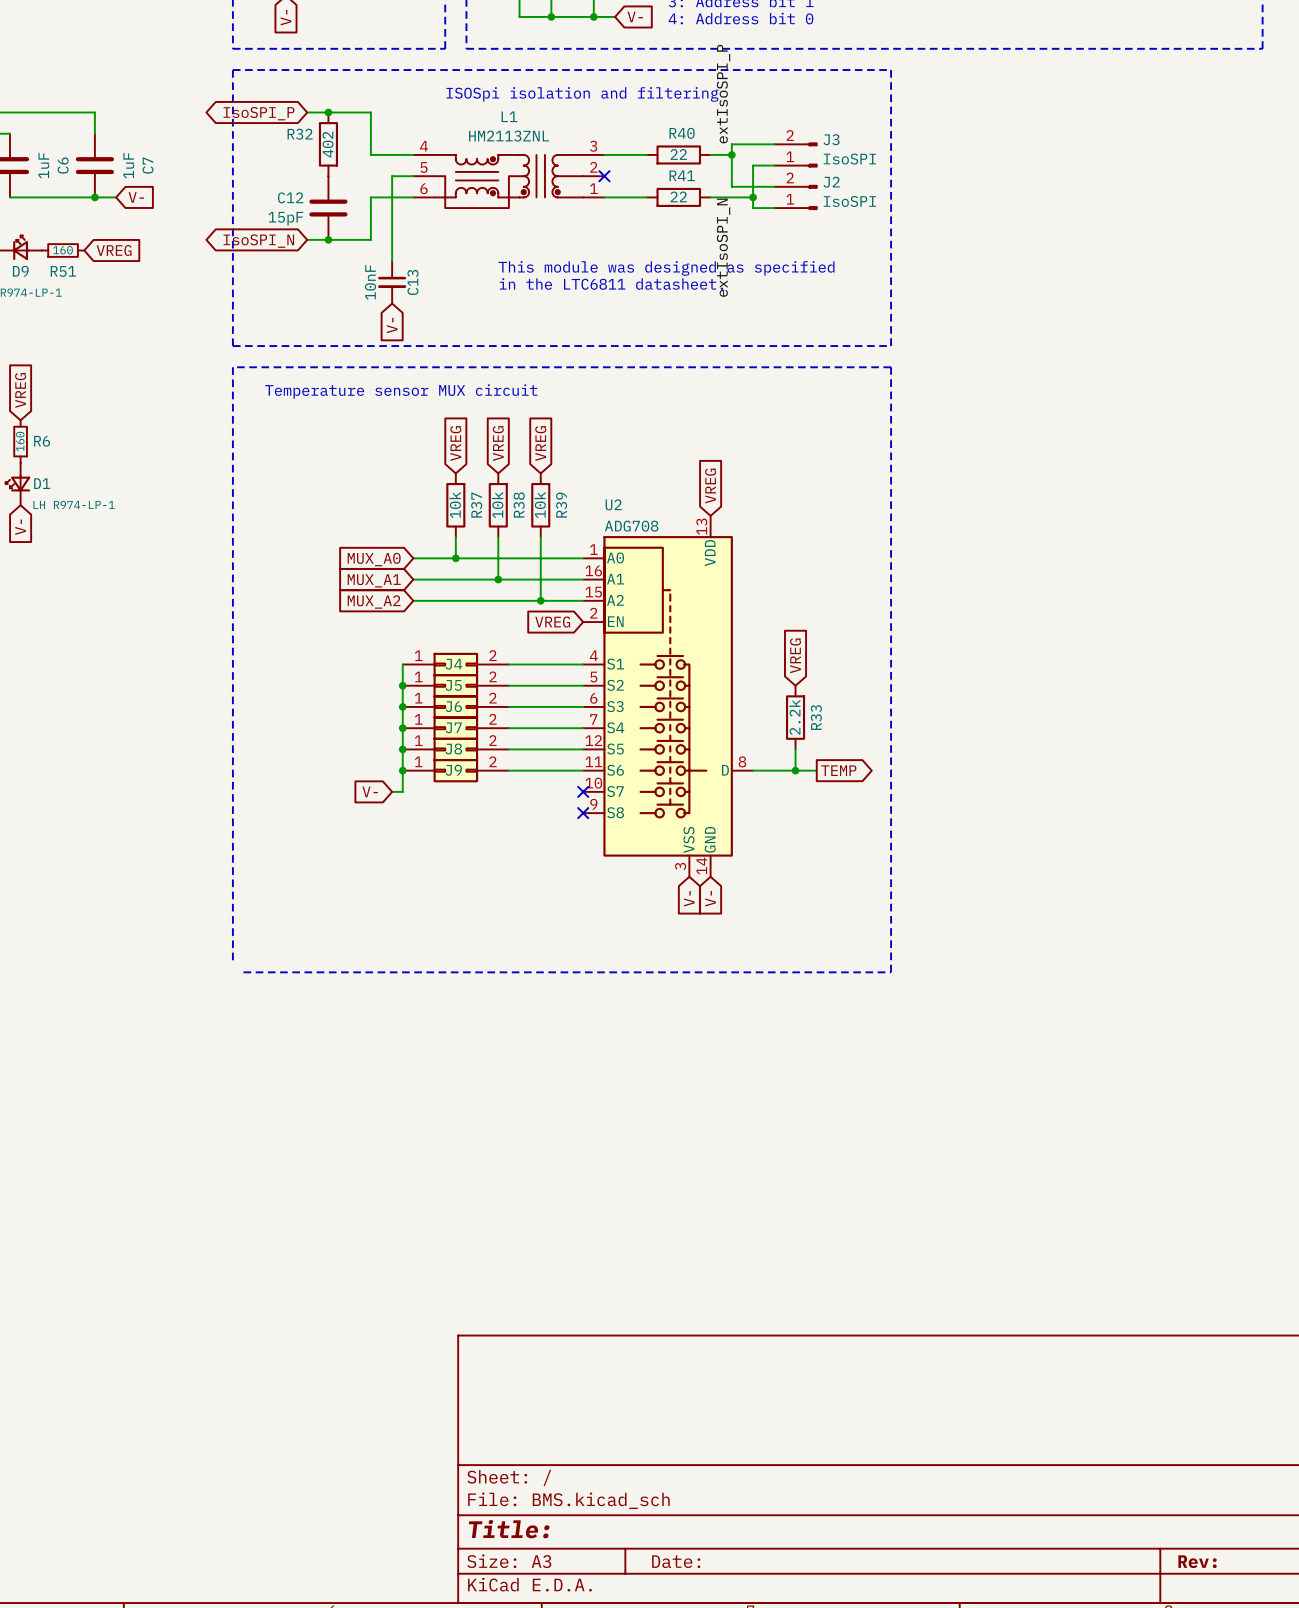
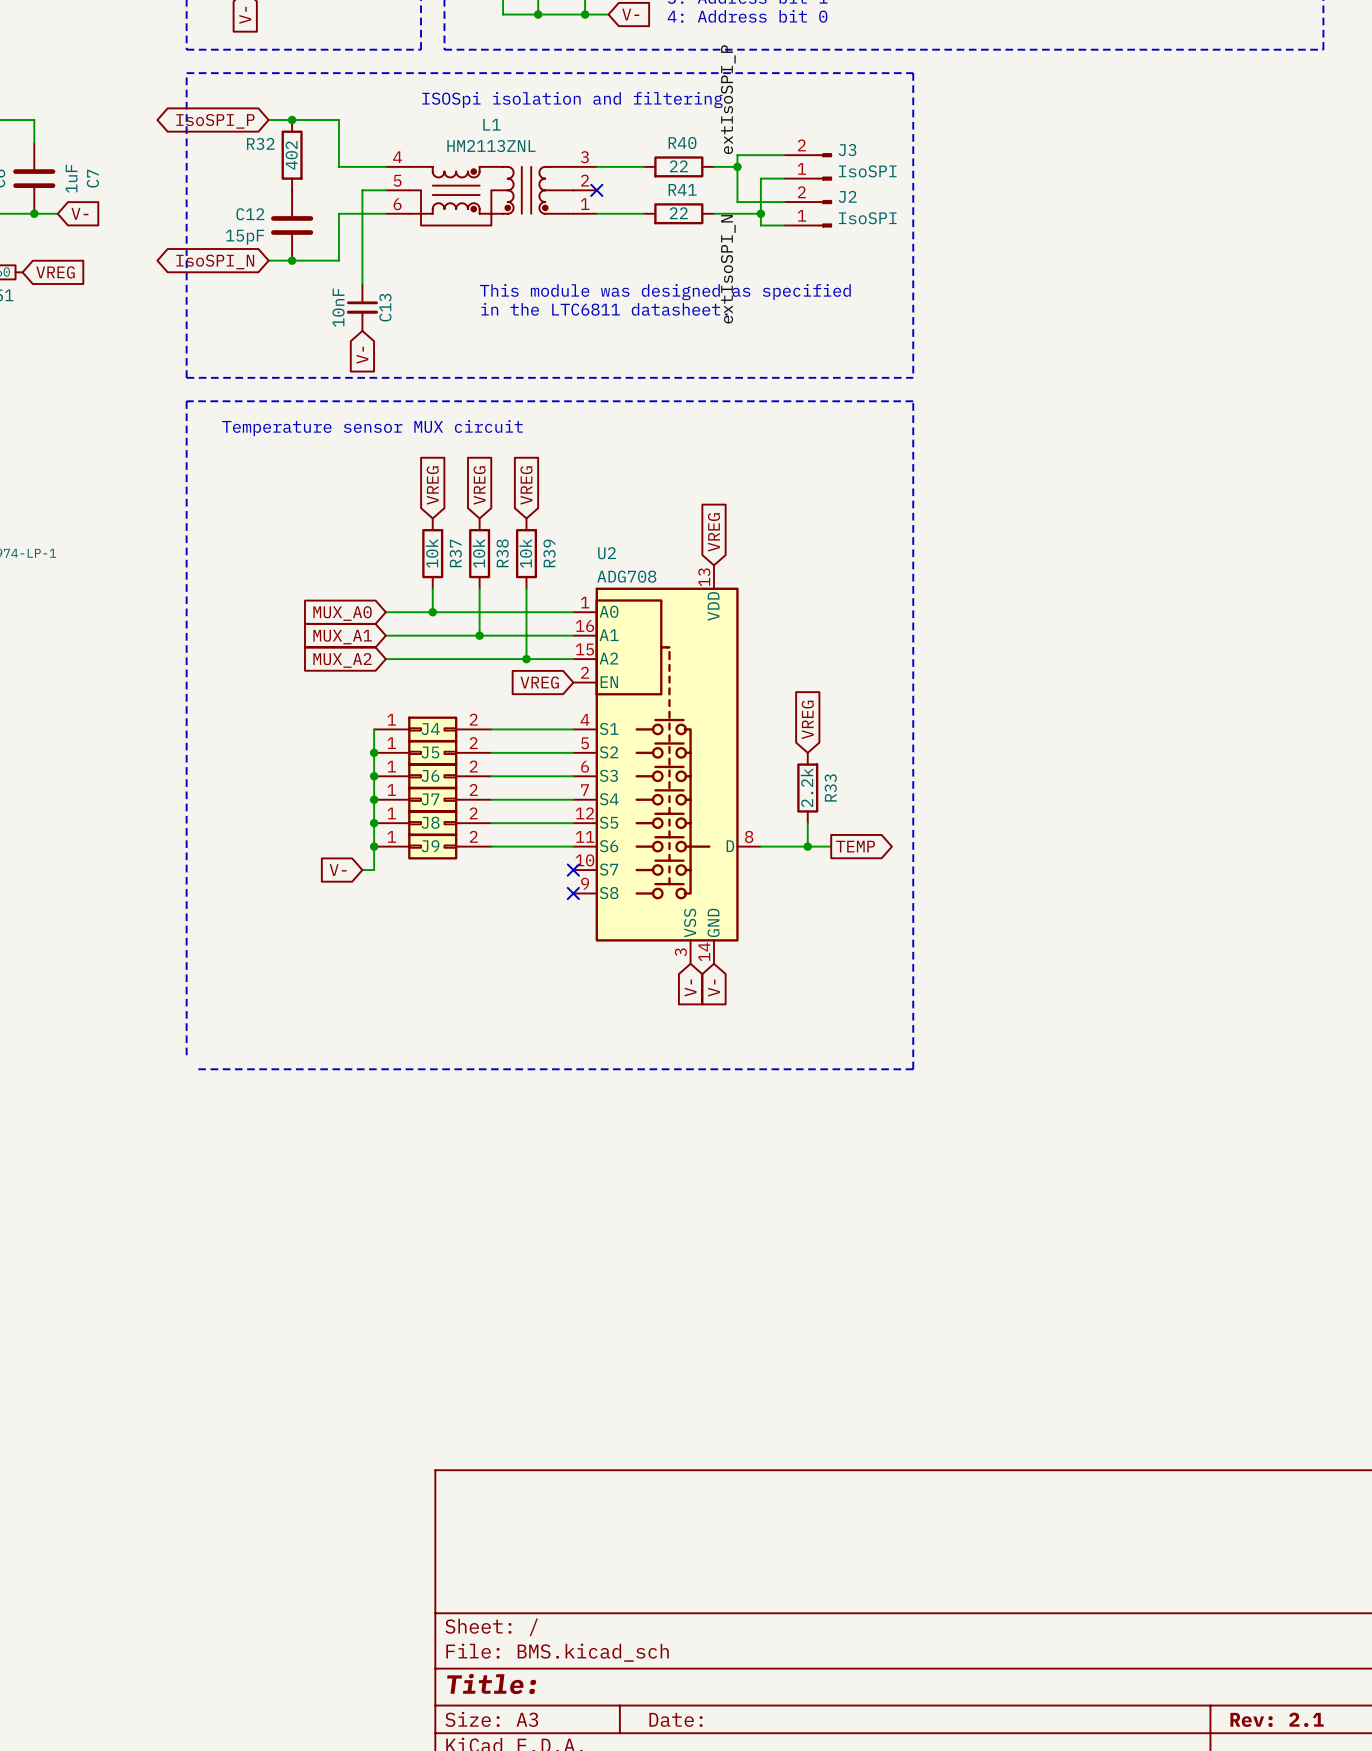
title block: Rev: (1197, 1561) -> Rev: 2.1 (1277, 1719)

